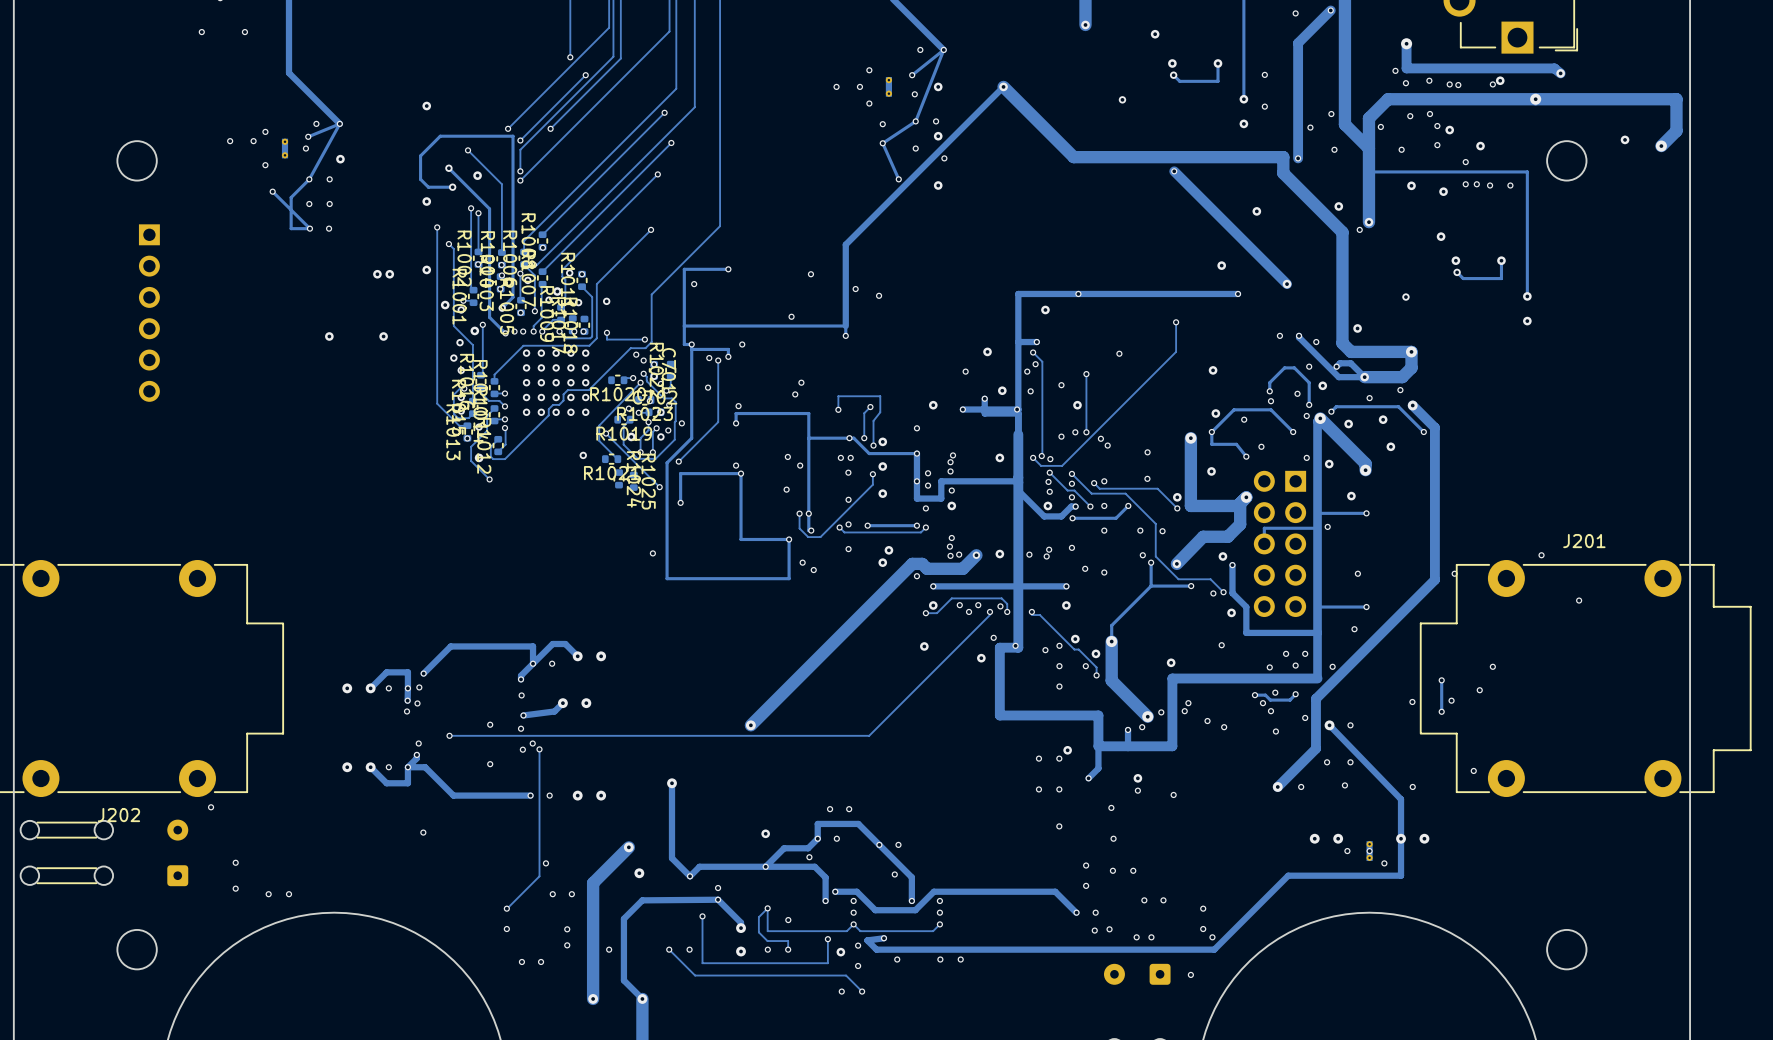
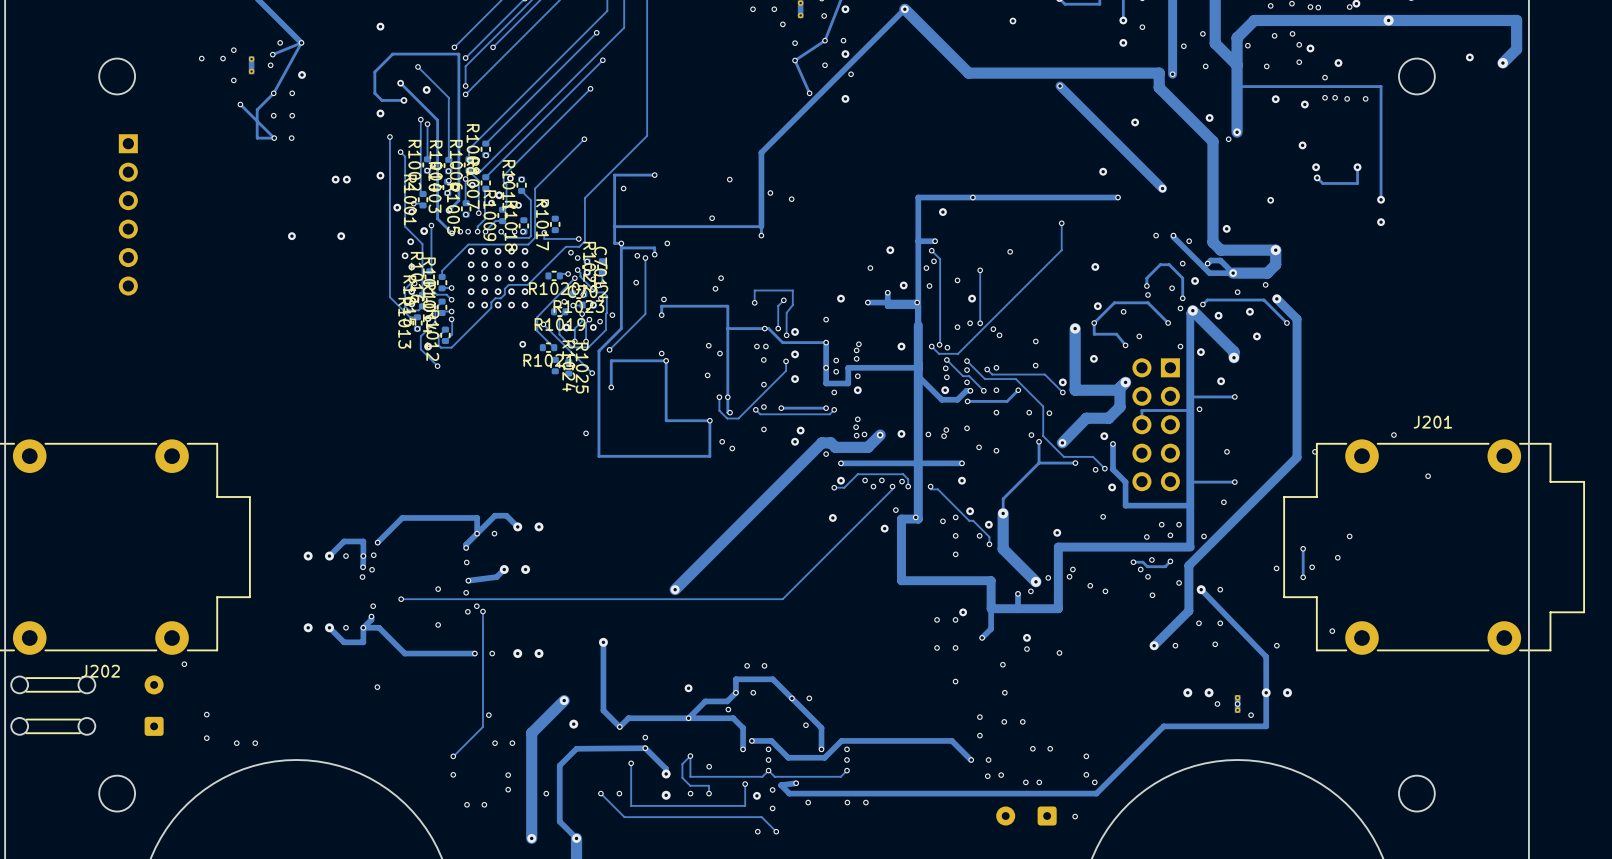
R1017 position: (572, 324) -> (555, 224)

